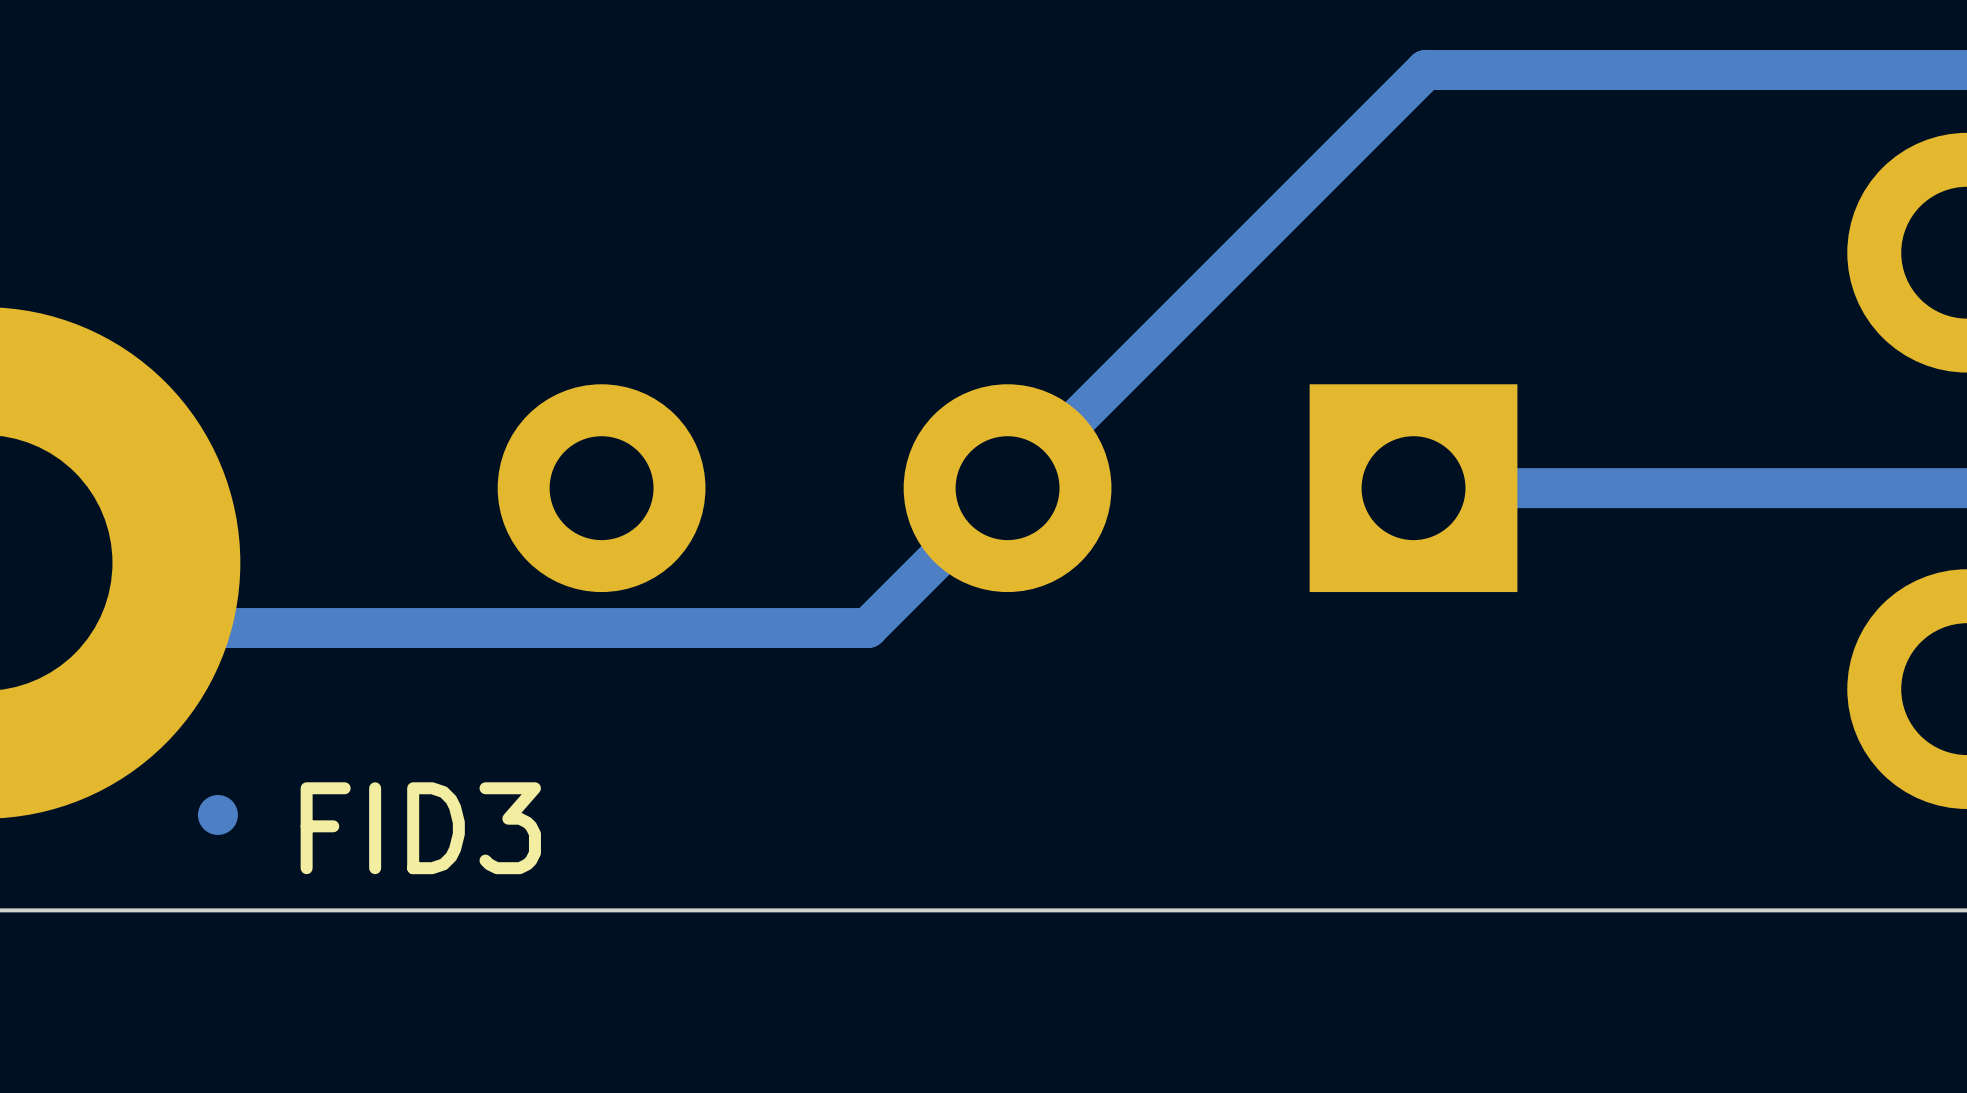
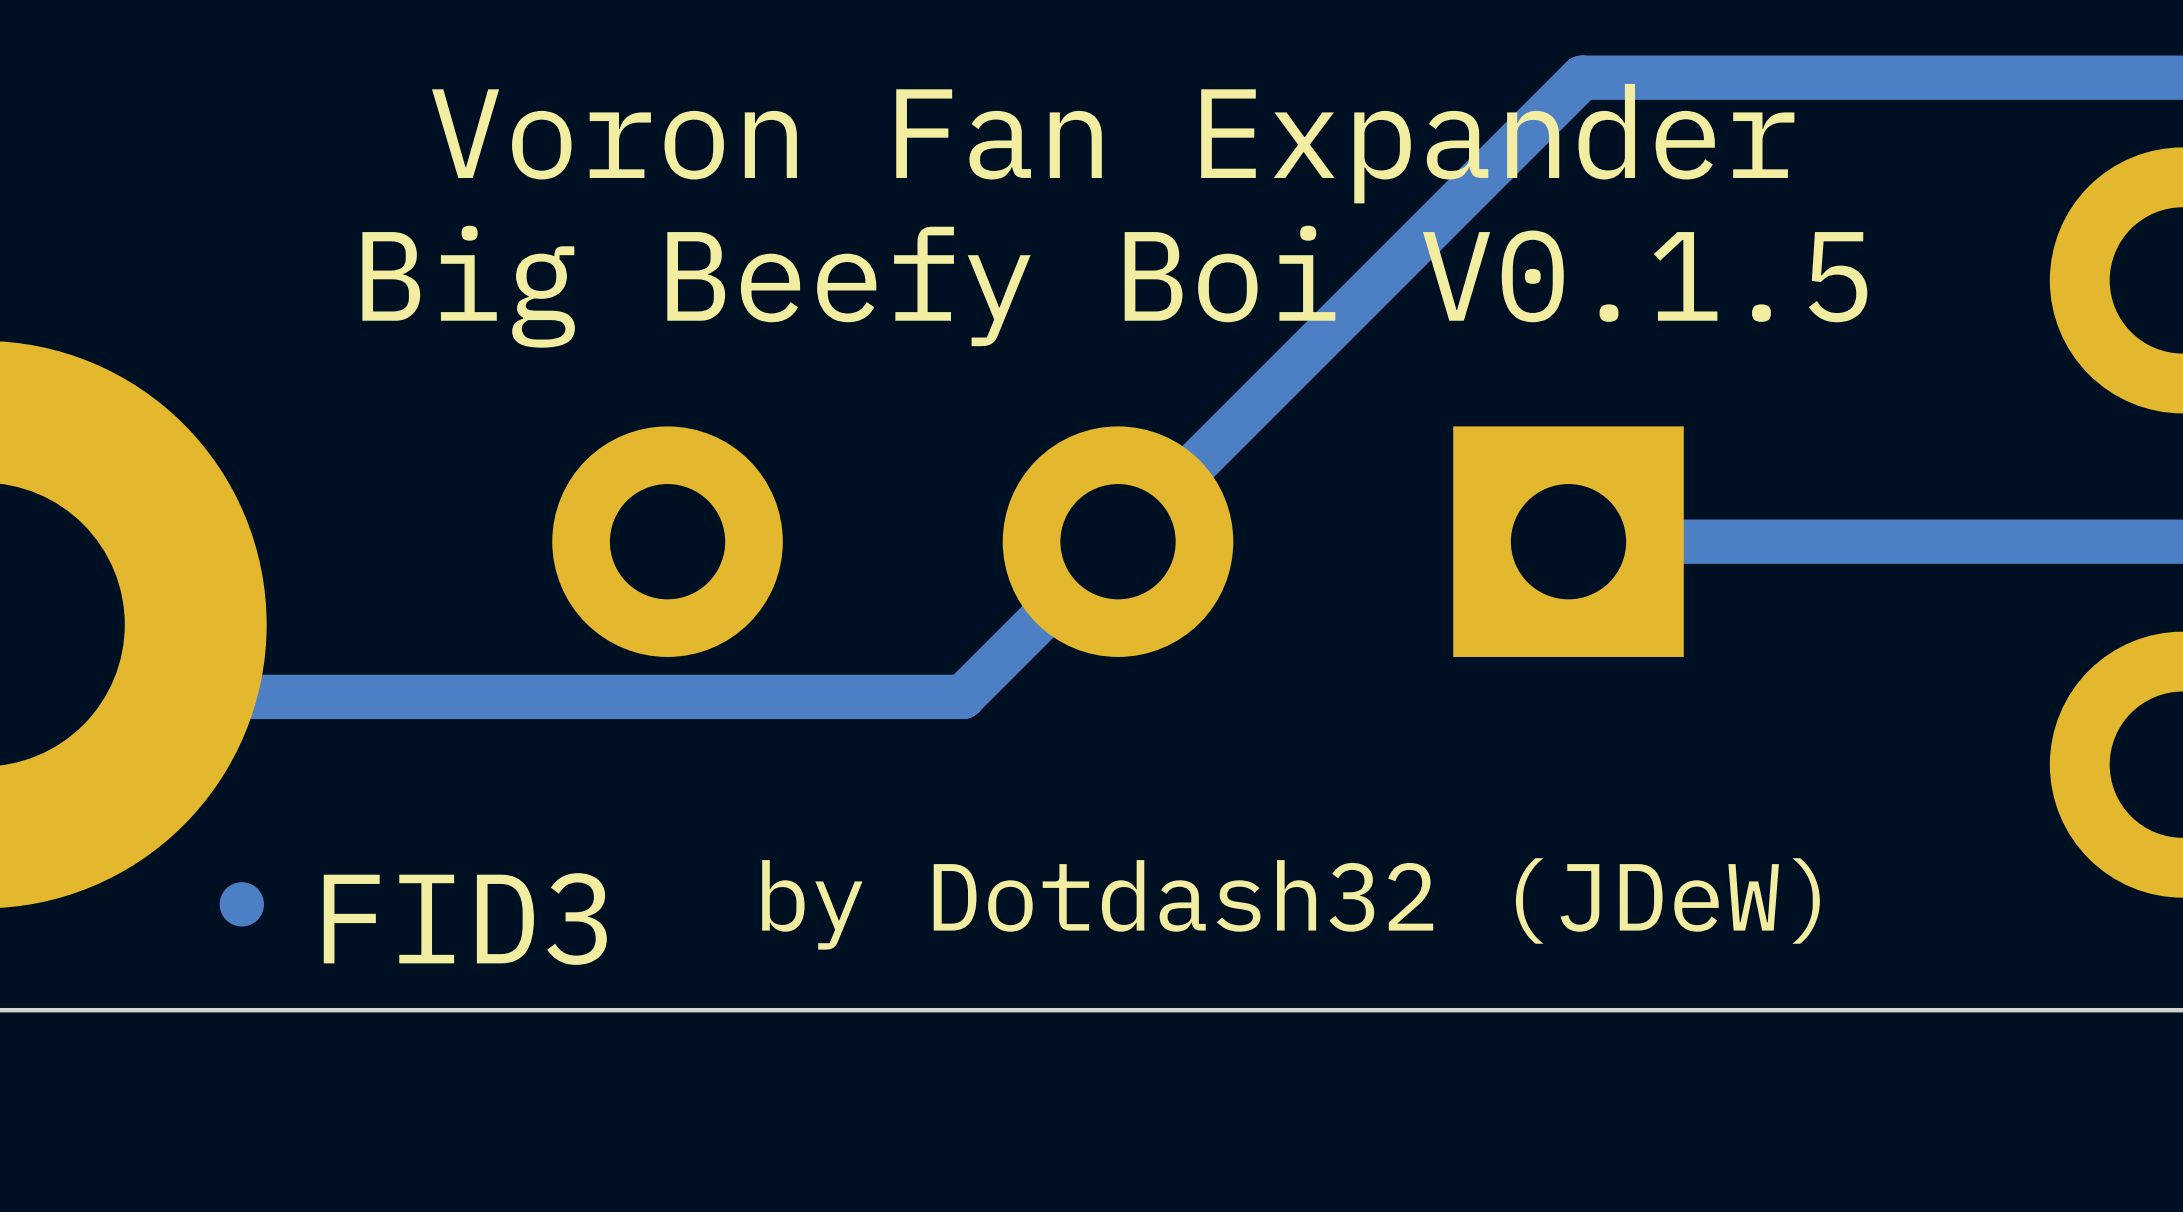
text: none -> Voron Fan Expander (1113, 143)
text: none -> Big Beefy Boi V0.1.5 (1114, 286)
text: none -> by Dotdash32 (JDeW) (1291, 903)

